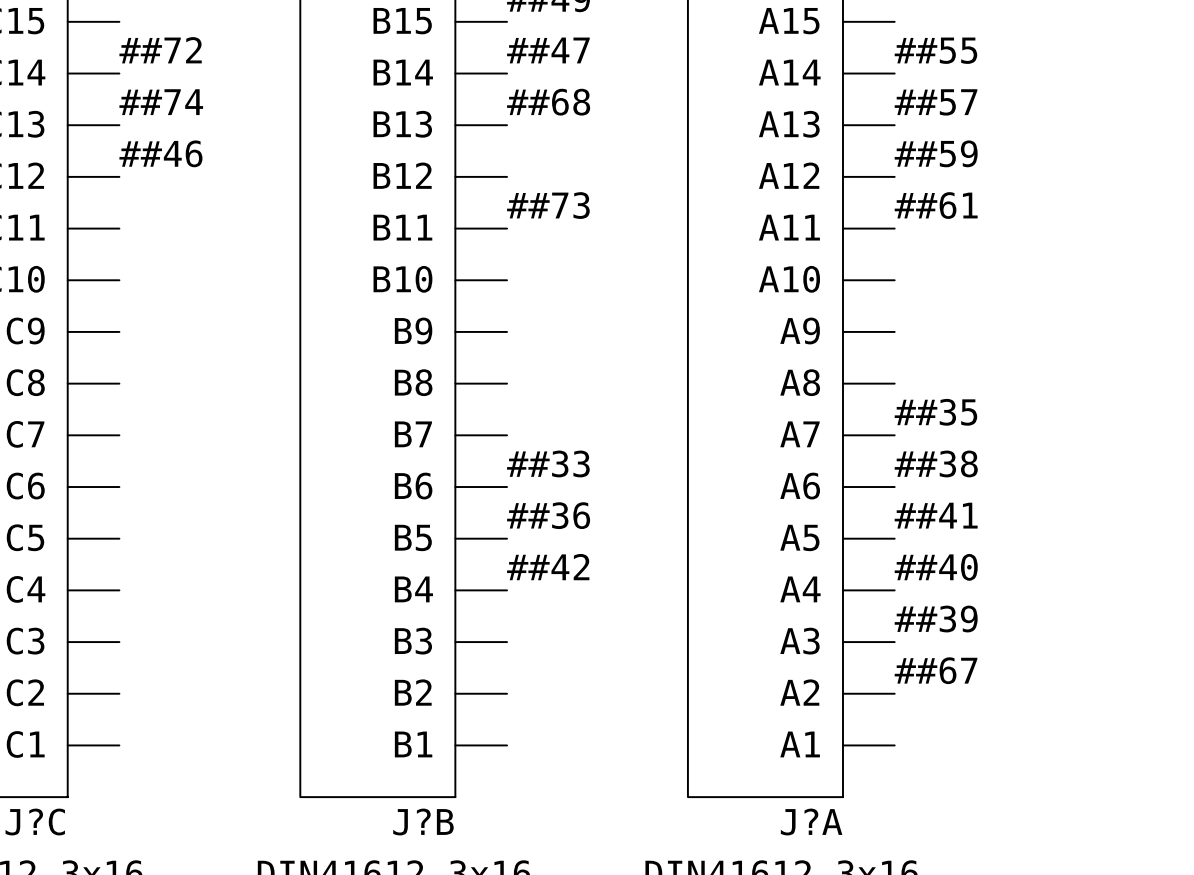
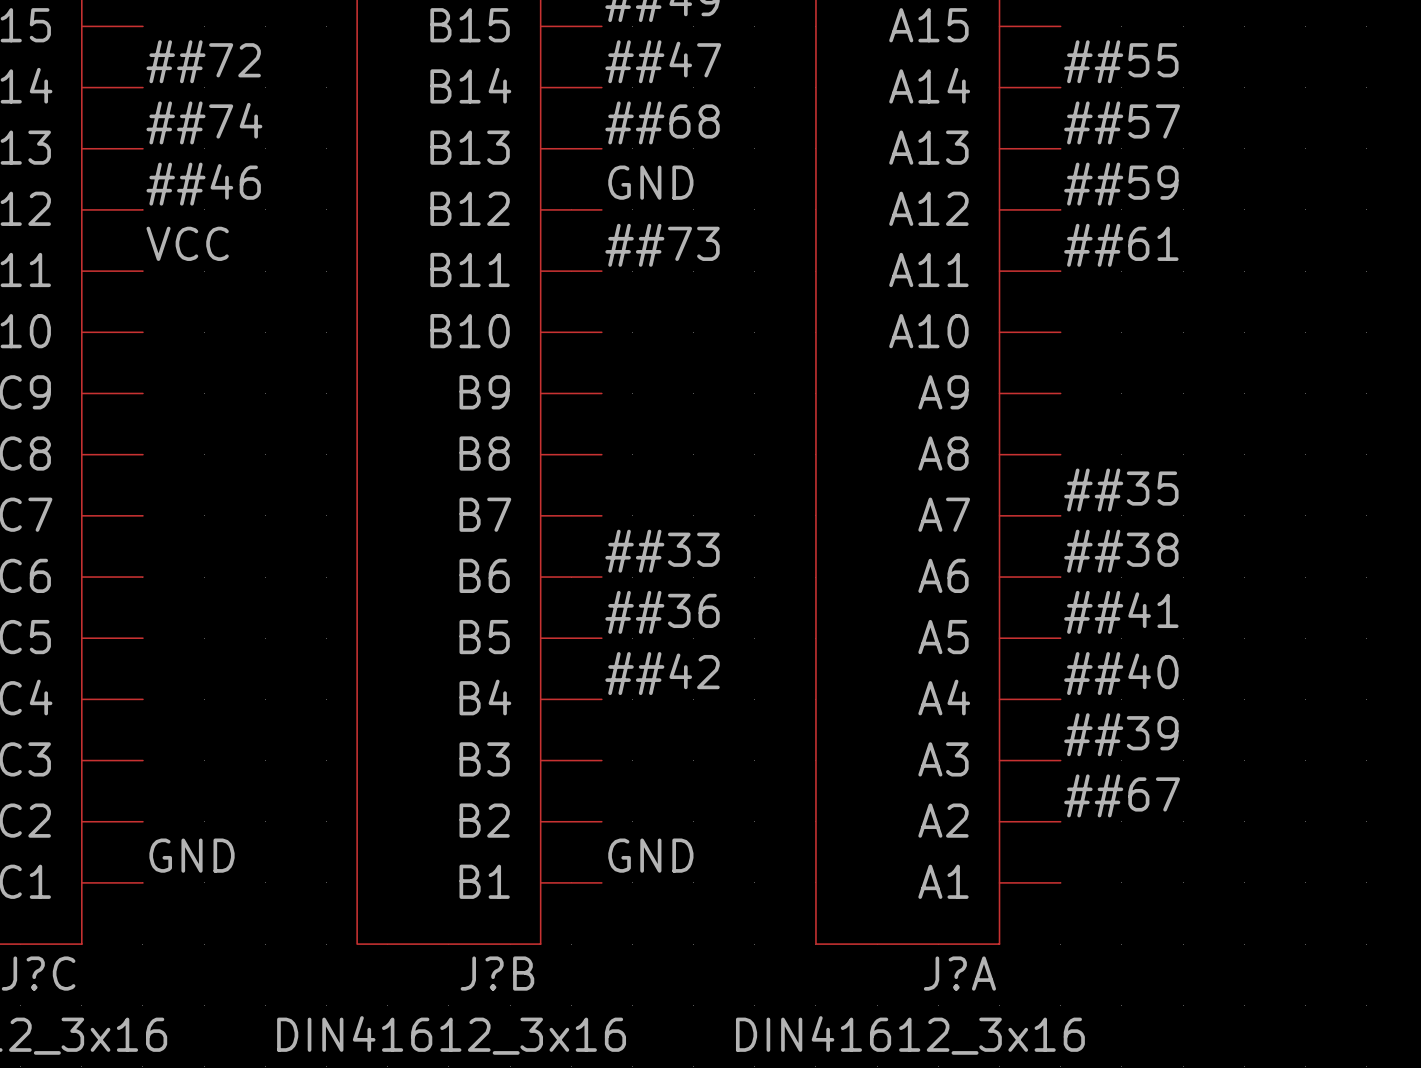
label: none -> GND (650, 182)
label: none -> VCC (187, 243)
label: none -> GND (192, 855)
label: none -> GND (650, 855)

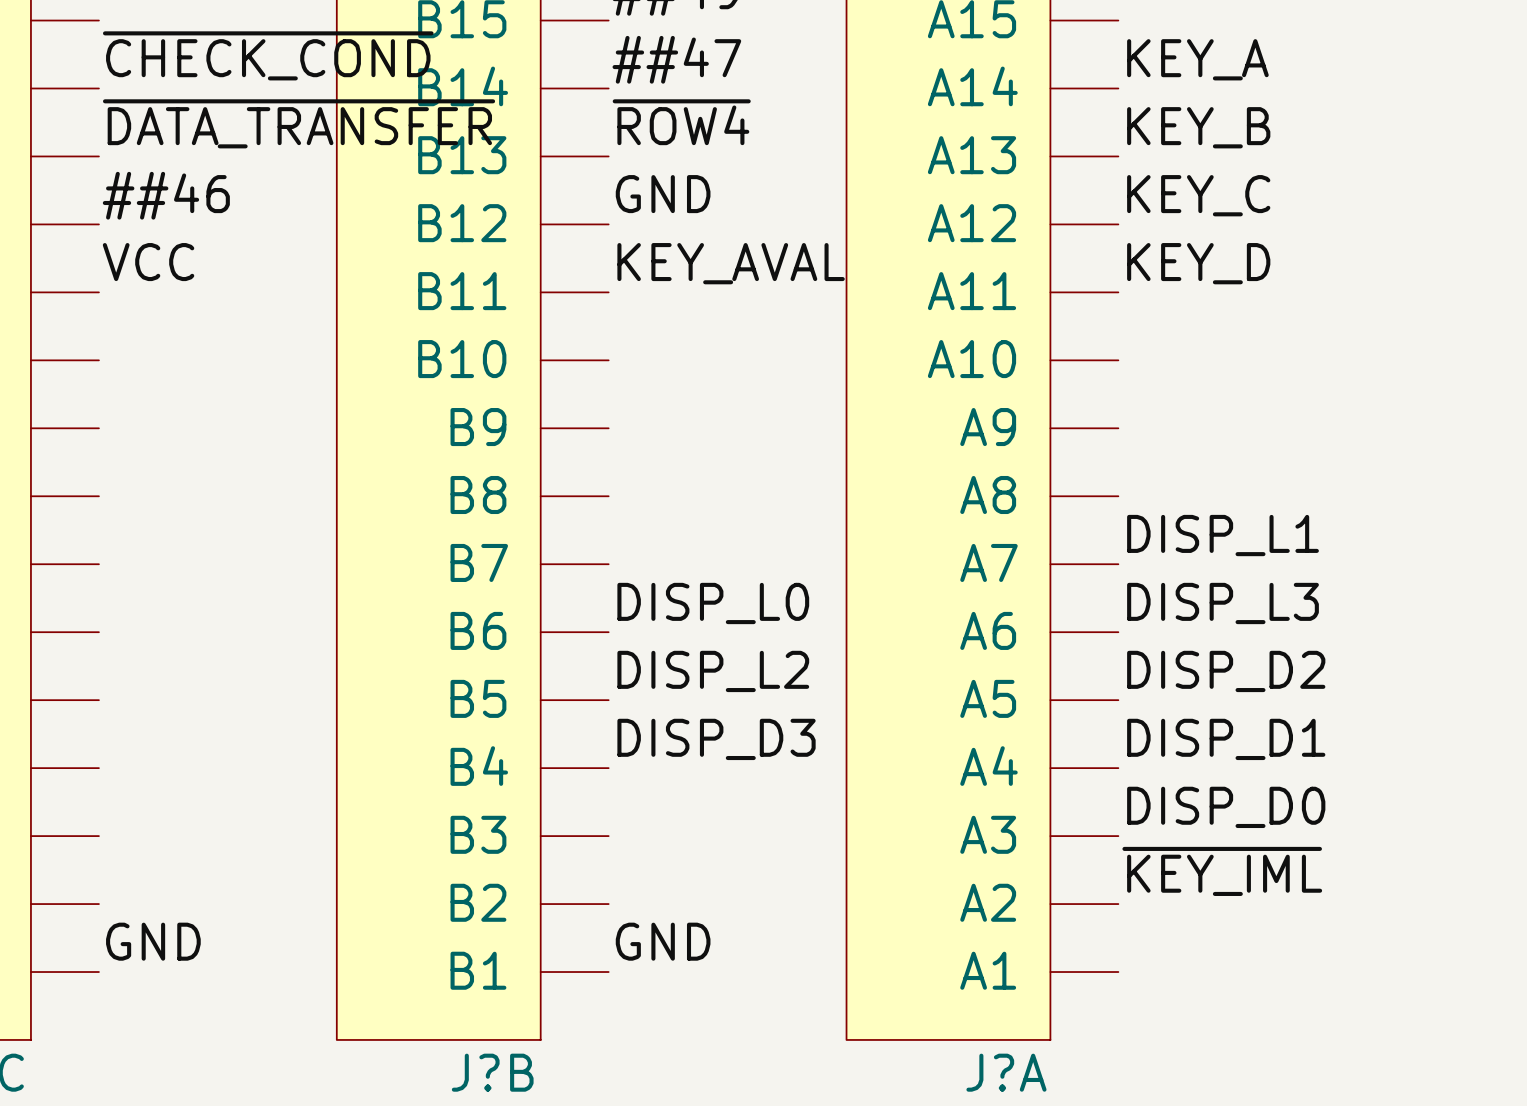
label: ##72 (203, 61) -> ~{CHECK_COND} (268, 55)
label: ##55 (1121, 61) -> KEY_A (1197, 59)
label: ##74 (204, 122) -> ~{DATA_TRANSFER} (299, 123)
label: ##68 (662, 122) -> ~{ROW4} (681, 122)
label: ##57 (1122, 122) -> KEY_B (1198, 127)
label: ##59 (1121, 184) -> KEY_C (1198, 195)
label: ##73 (662, 245) -> KEY_AVAL (731, 263)
label: ##61 (1121, 245) -> KEY_D (1198, 263)
label: ##35 (1121, 490) -> DISP_L1 (1223, 535)
label: ##33 (662, 551) -> DISP_L0 (713, 603)
label: ##38 (1121, 551) -> DISP_L3 (1223, 603)
label: ##36 (662, 612) -> DISP_L2 (713, 671)
label: ##41 (1121, 612) -> DISP_D2 (1226, 671)
label: ##42 (662, 673) -> DISP_D3 (716, 739)
label: ##40 (1121, 673) -> DISP_D1 (1226, 739)
label: ##39 (1121, 734) -> DISP_D0 (1226, 807)
label: ##67 (1122, 795) -> ~{KEY_IML} (1222, 871)

